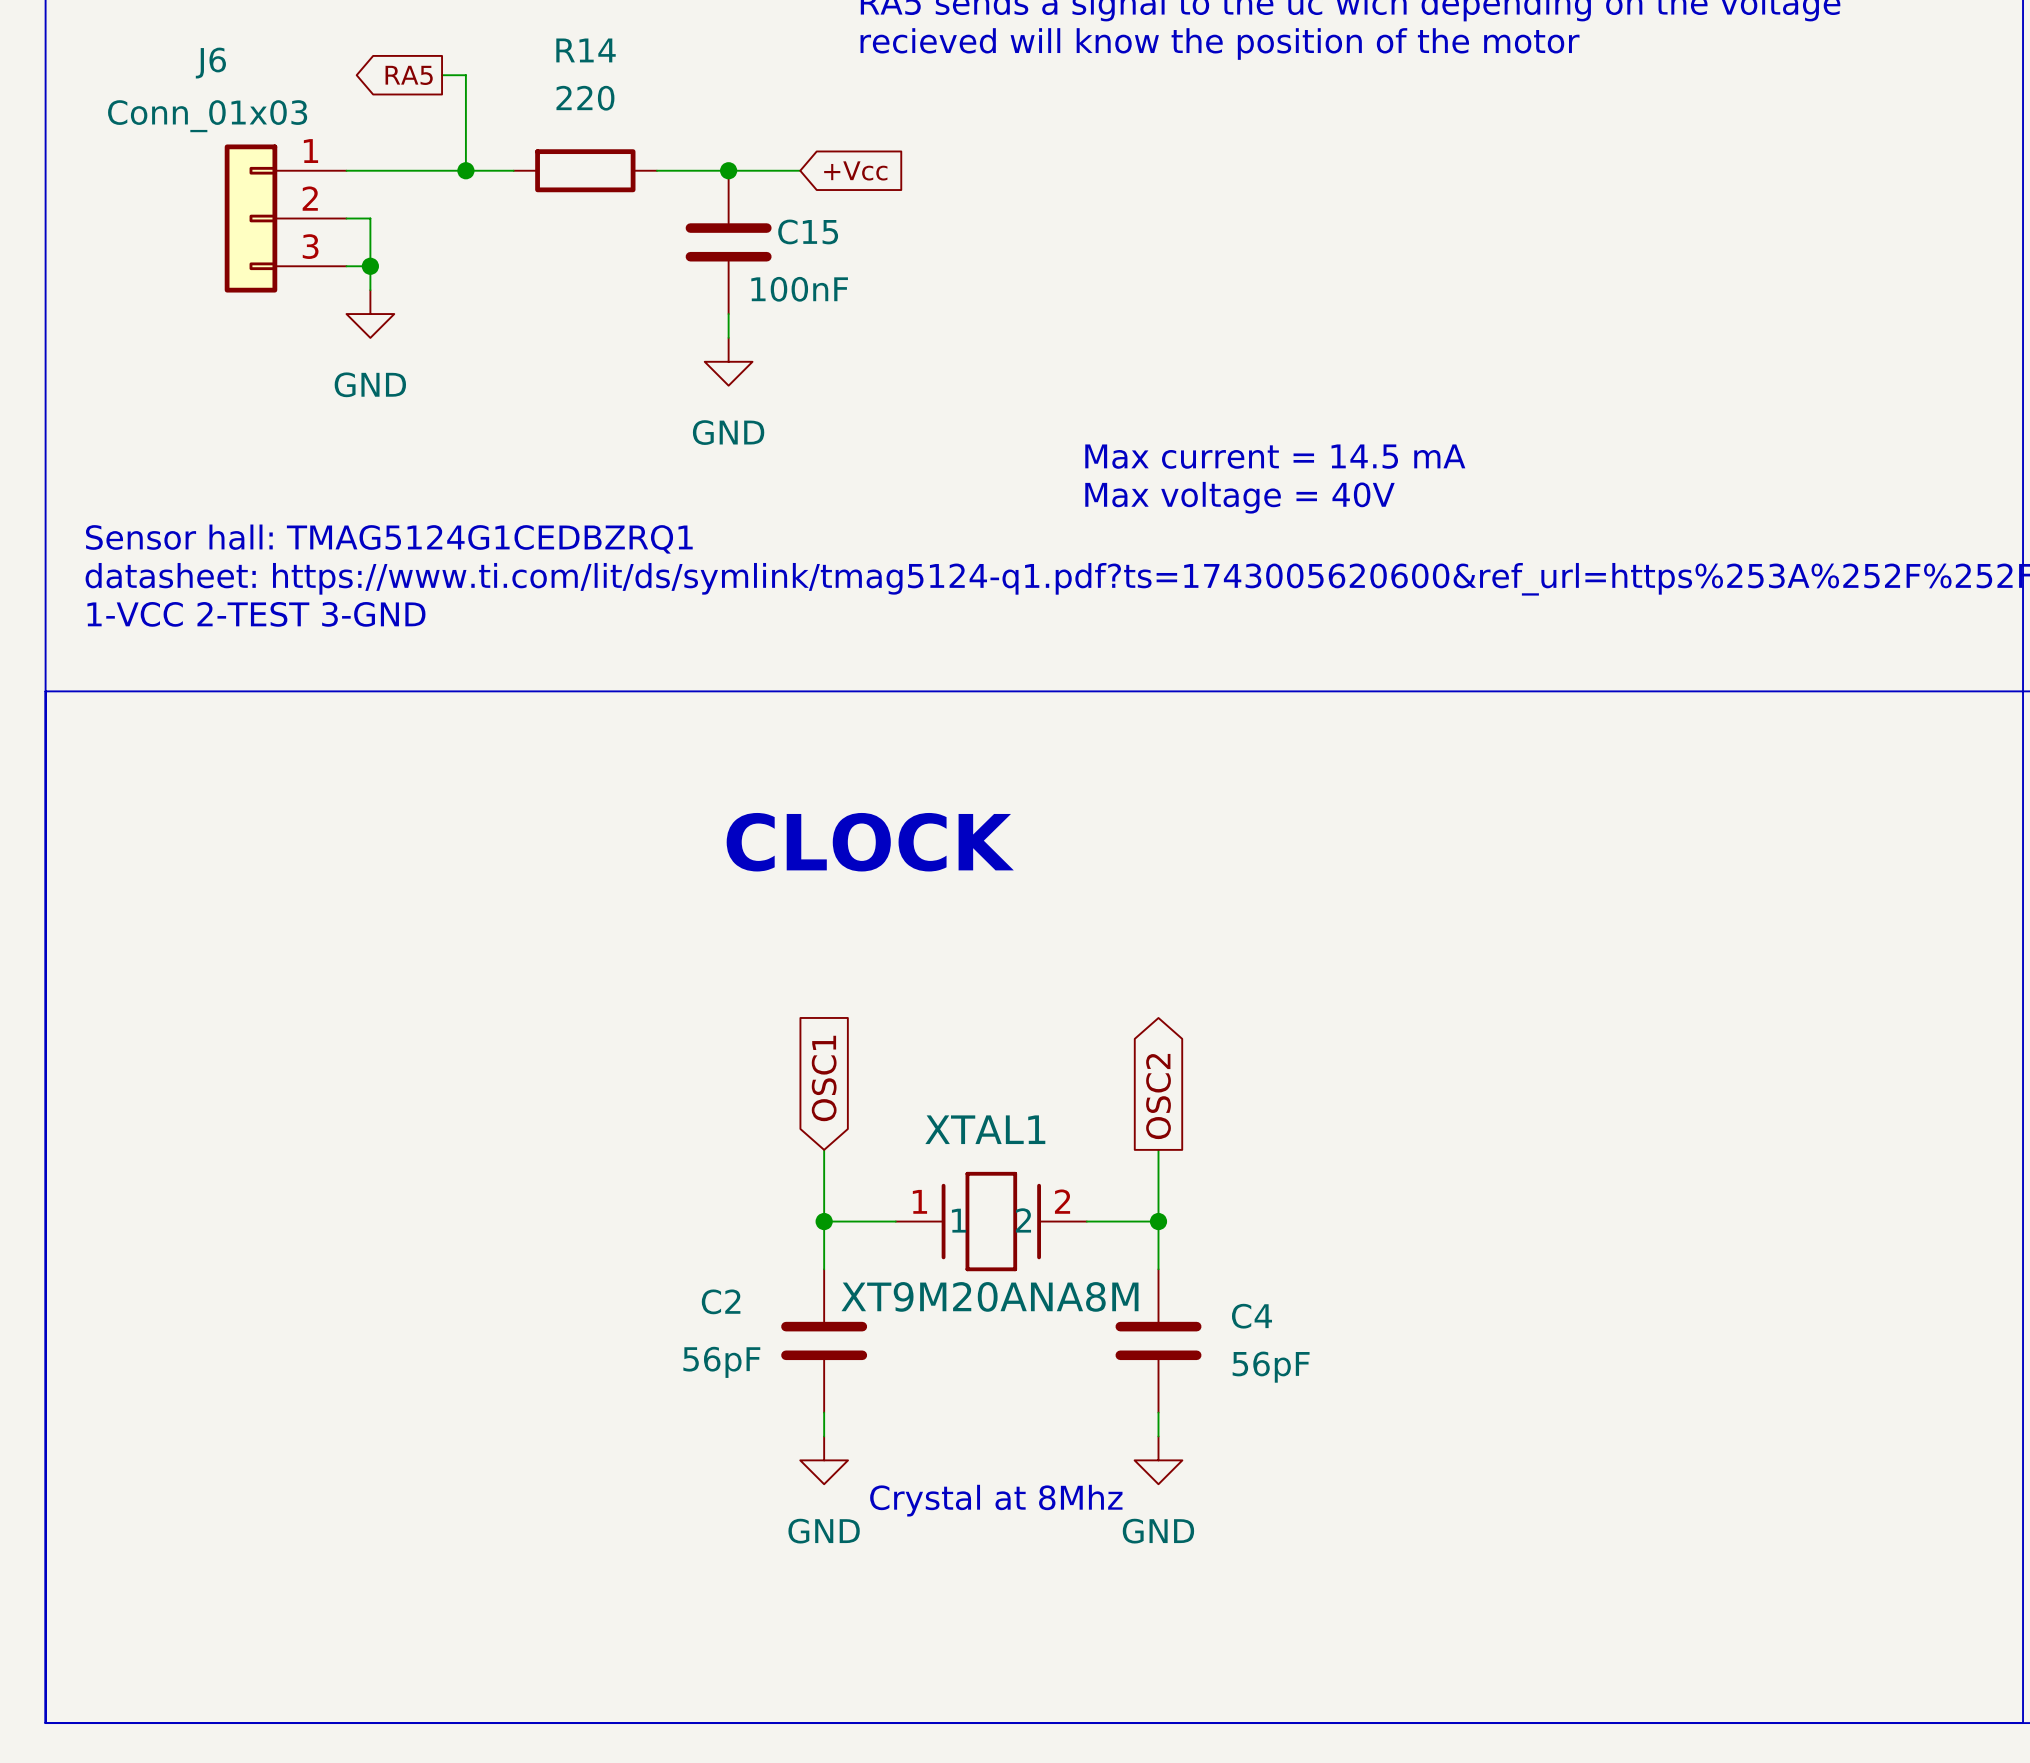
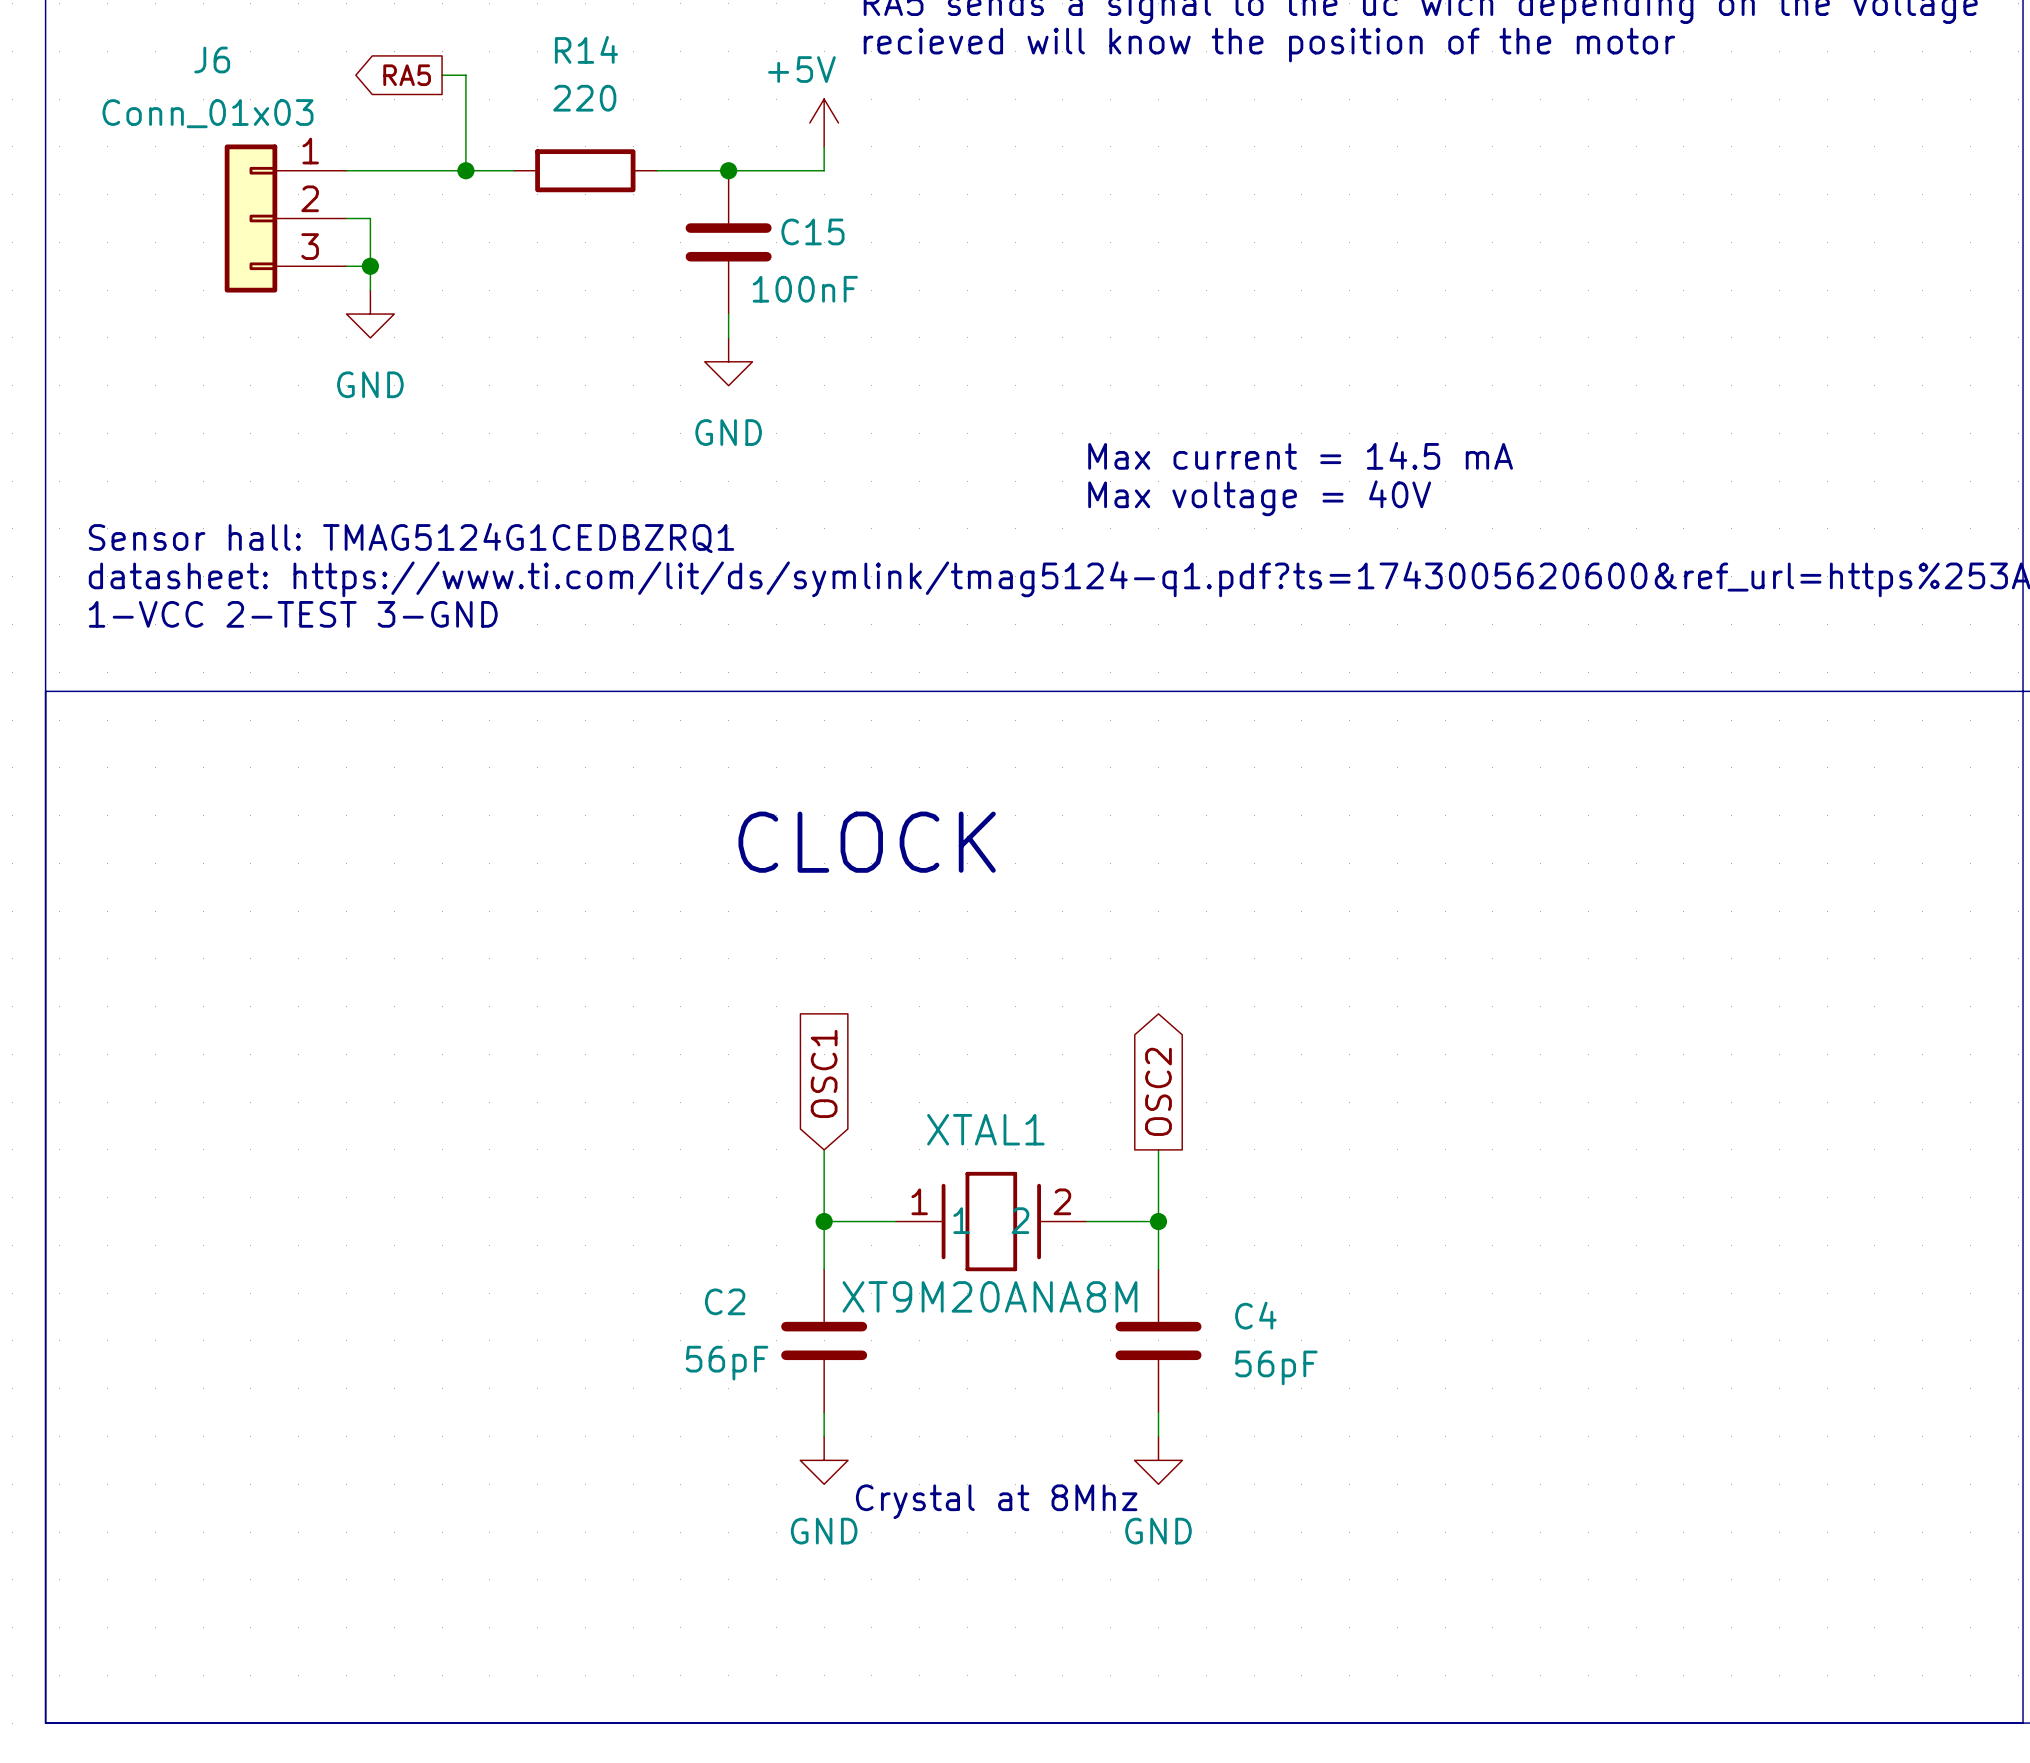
power symbol: none -> +5V (824, 122)
wire: none -> (824, 146) (824, 170) (800, 170)
global label: +Vcc (855, 170) -> none

